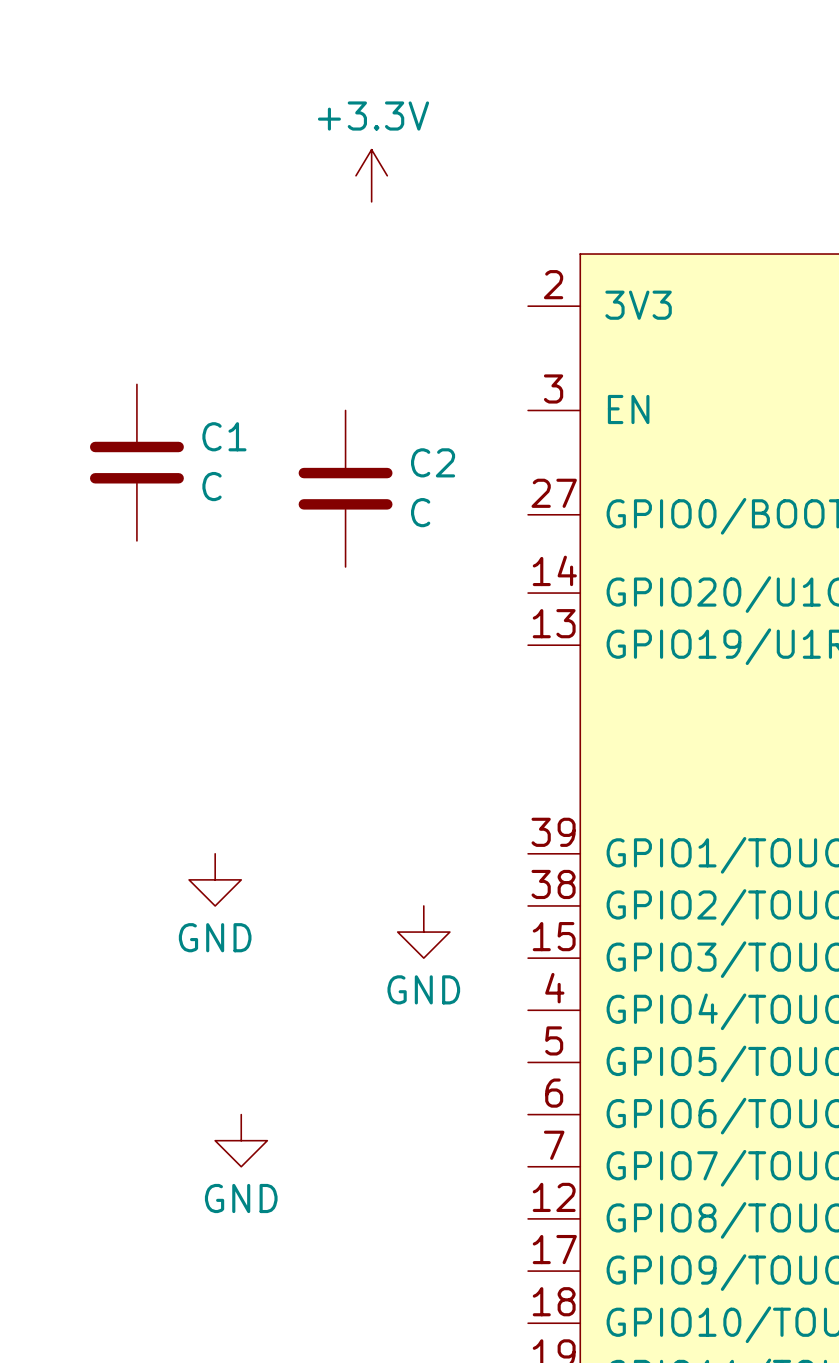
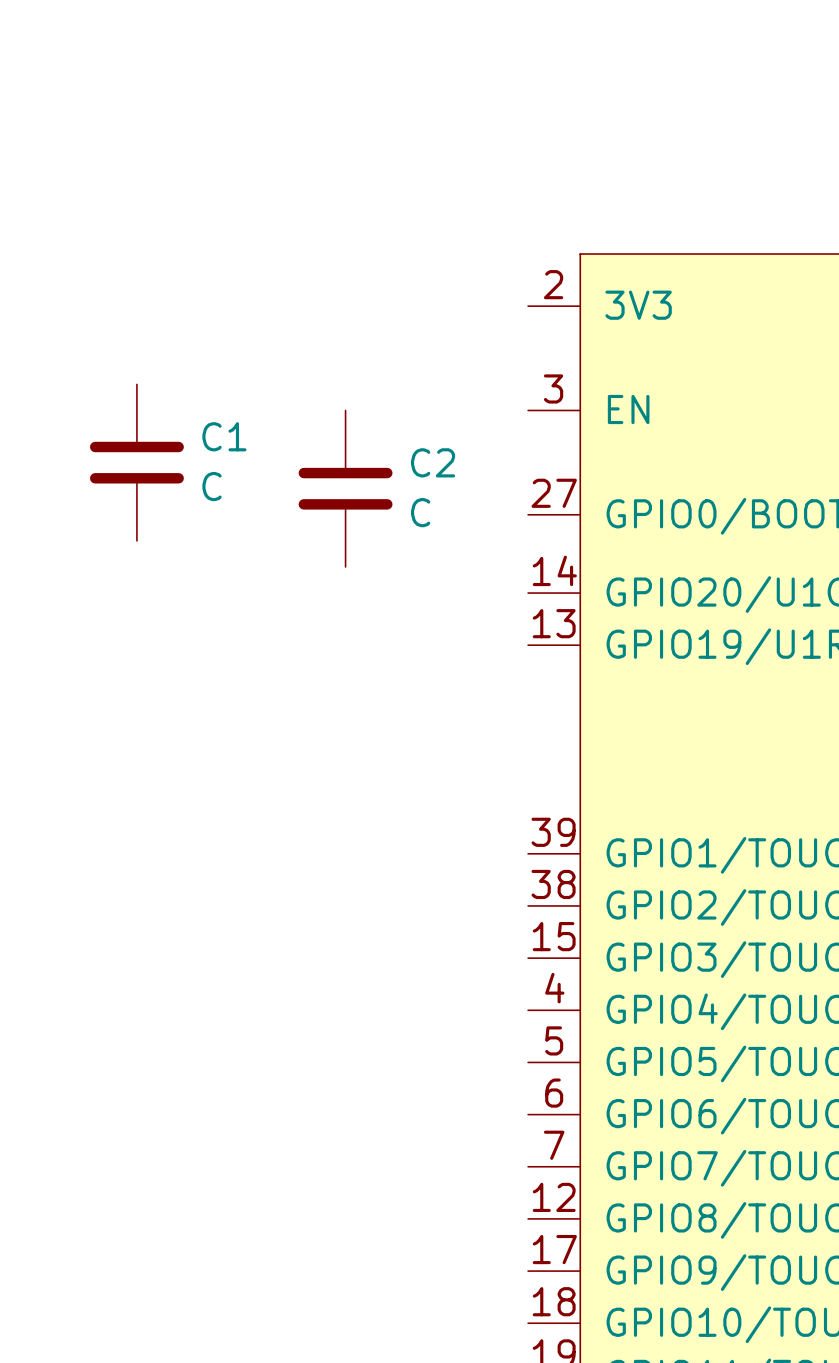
power symbol: +3.3V (371, 175) -> none
power symbol: GND (215, 879) -> none
power symbol: GND (423, 932) -> none
power symbol: GND (241, 1140) -> none

